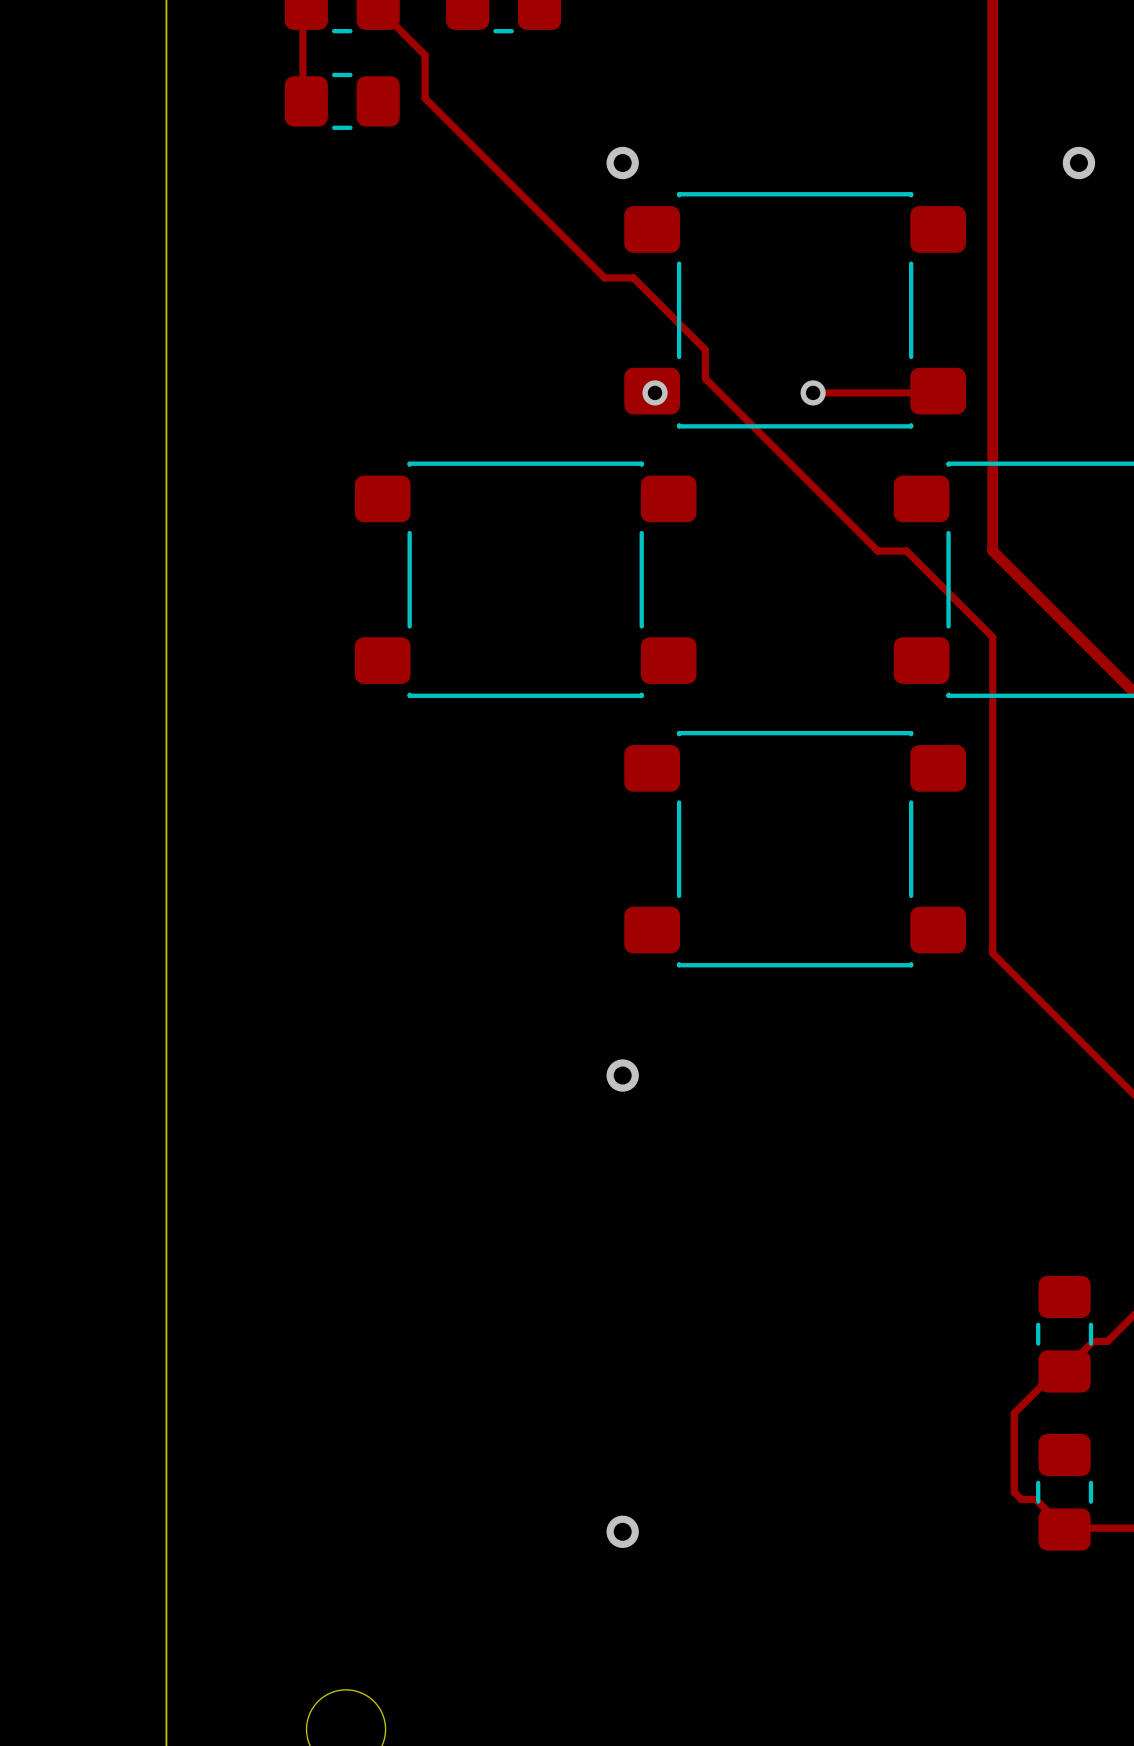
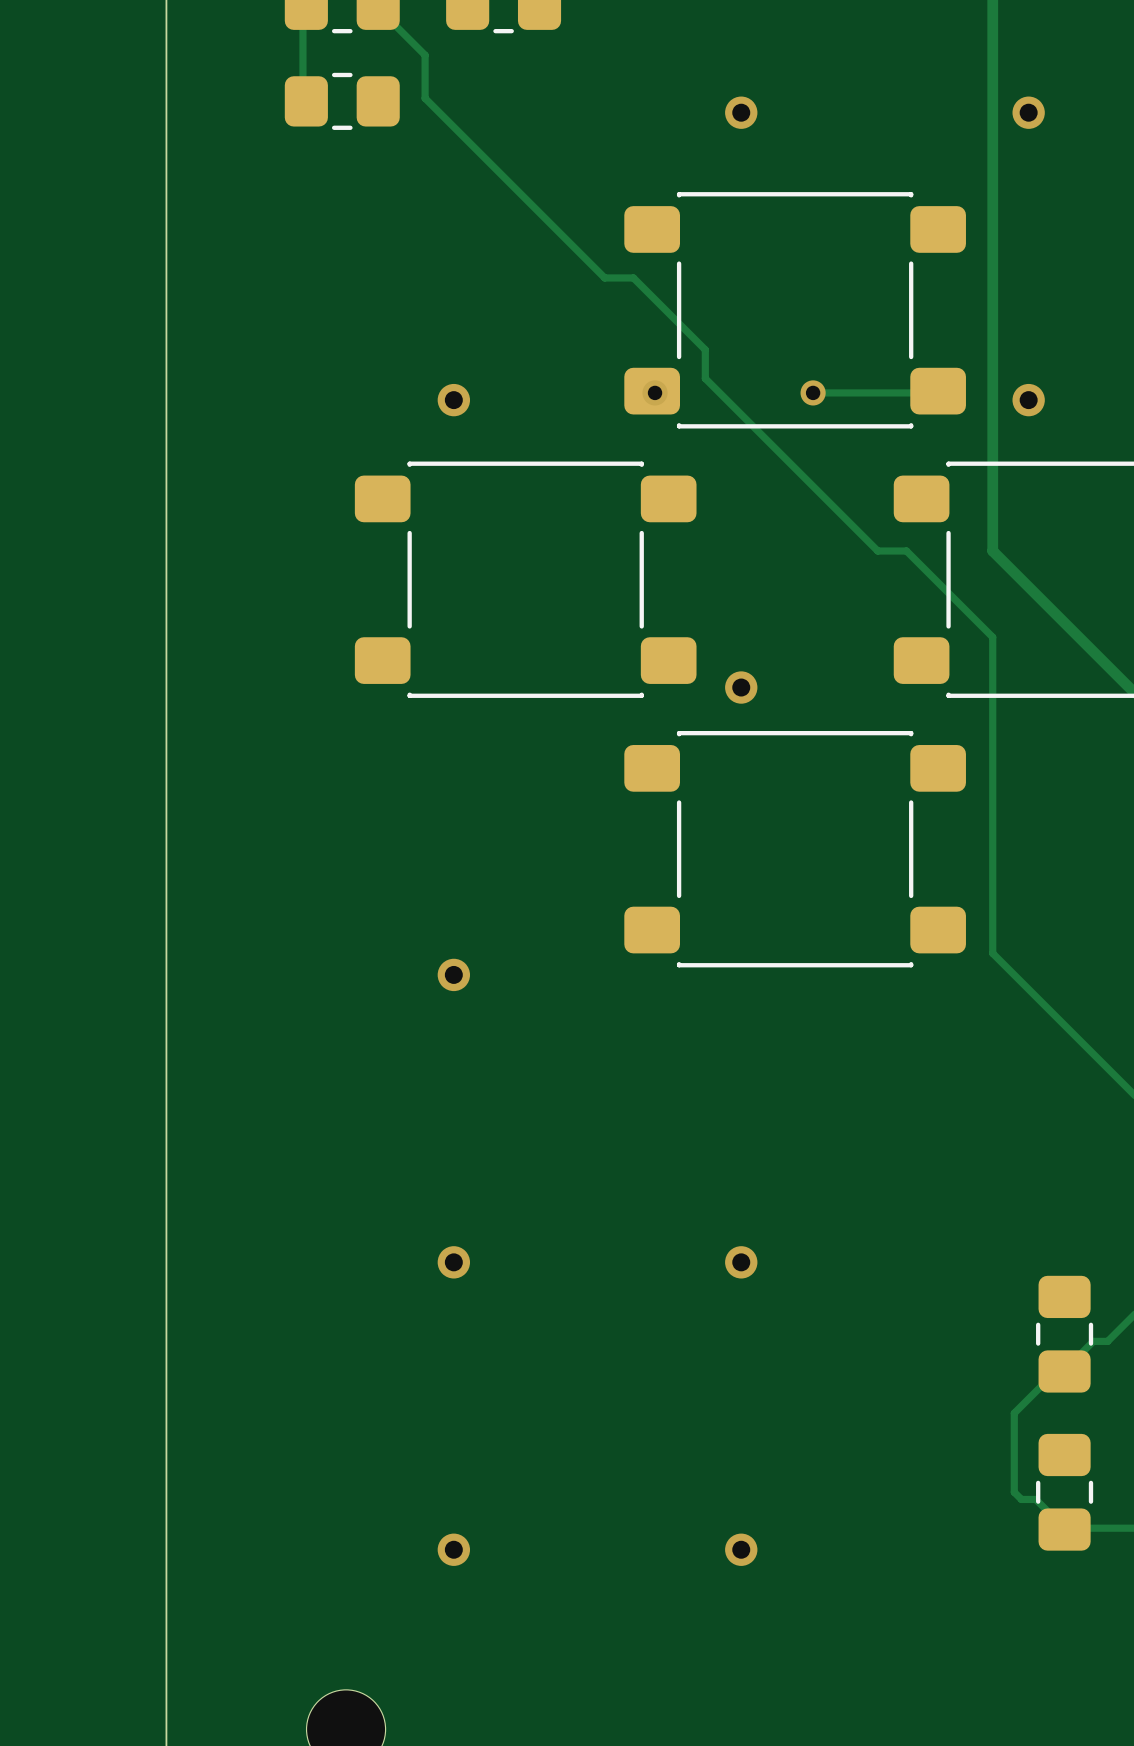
via position: (622, 163) -> (741, 112)
via position: (1078, 163) -> (1028, 112)
via: none -> (453, 400)
via: none -> (1028, 400)
via: none -> (741, 687)
via: none -> (453, 974)
via: (622, 1075) -> none
via: none -> (453, 1262)
via: none -> (741, 1262)
via: (622, 1531) -> none
via: none -> (453, 1549)
via: none -> (741, 1549)

